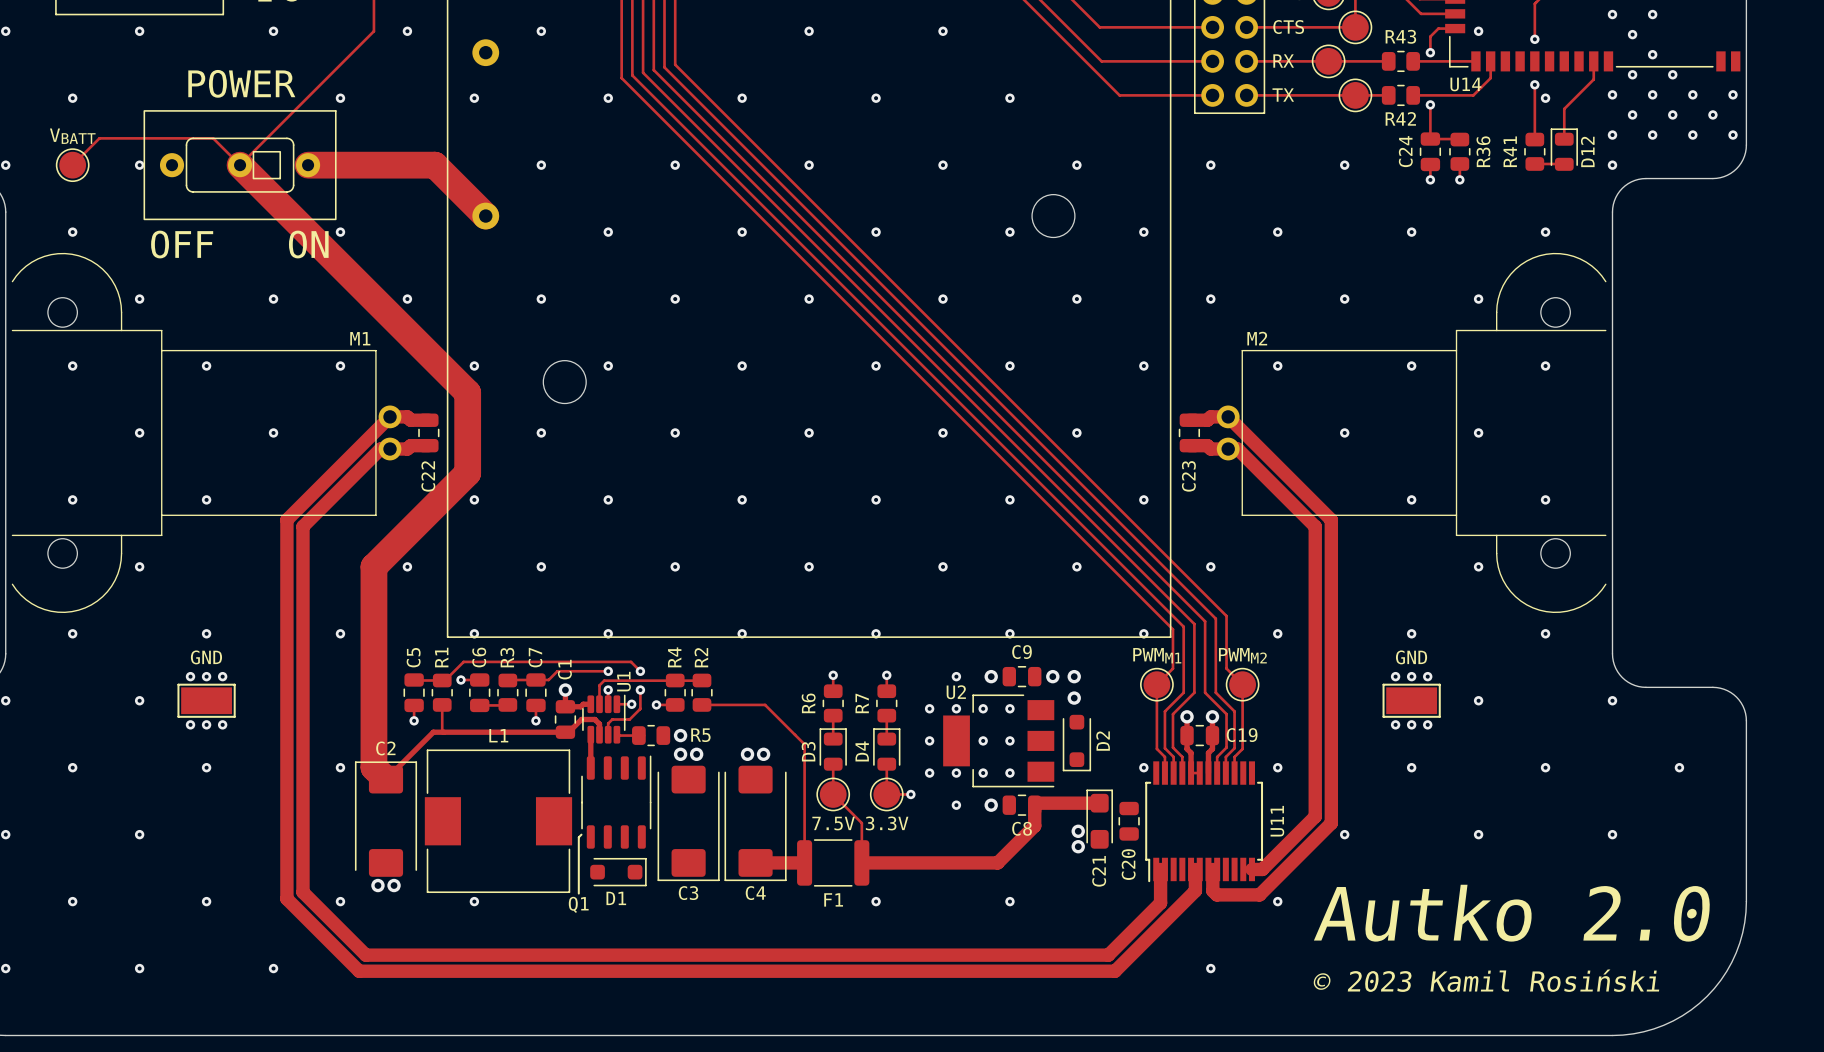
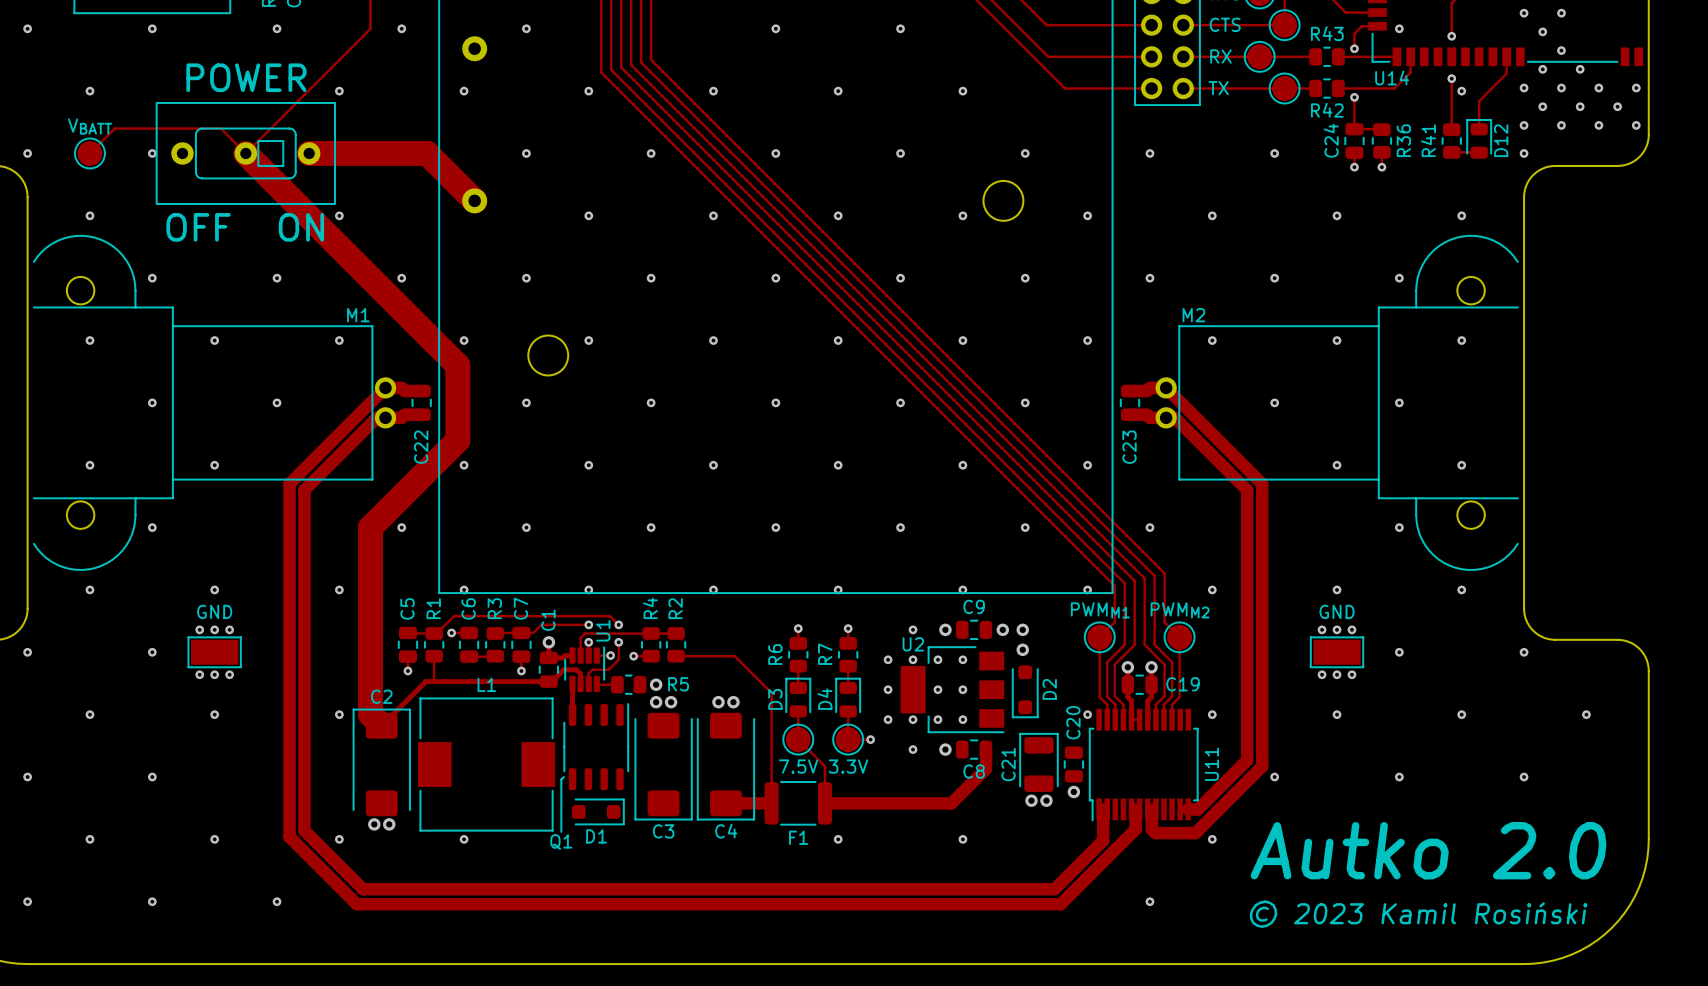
C21 footprint: [1086, 789, 1113, 849] -> [1019, 733, 1059, 792]
track: (1034, 803) (1099, 803) -> none
via: (1078, 831) -> none
via: (1078, 846) -> none
via: none -> (1073, 791)
via: none -> (1031, 800)
via: none -> (1046, 800)
C20 name position: C20 (1128, 864) -> C20 (1073, 722)
C21 name position: C21 (1099, 871) -> C21 (1008, 764)

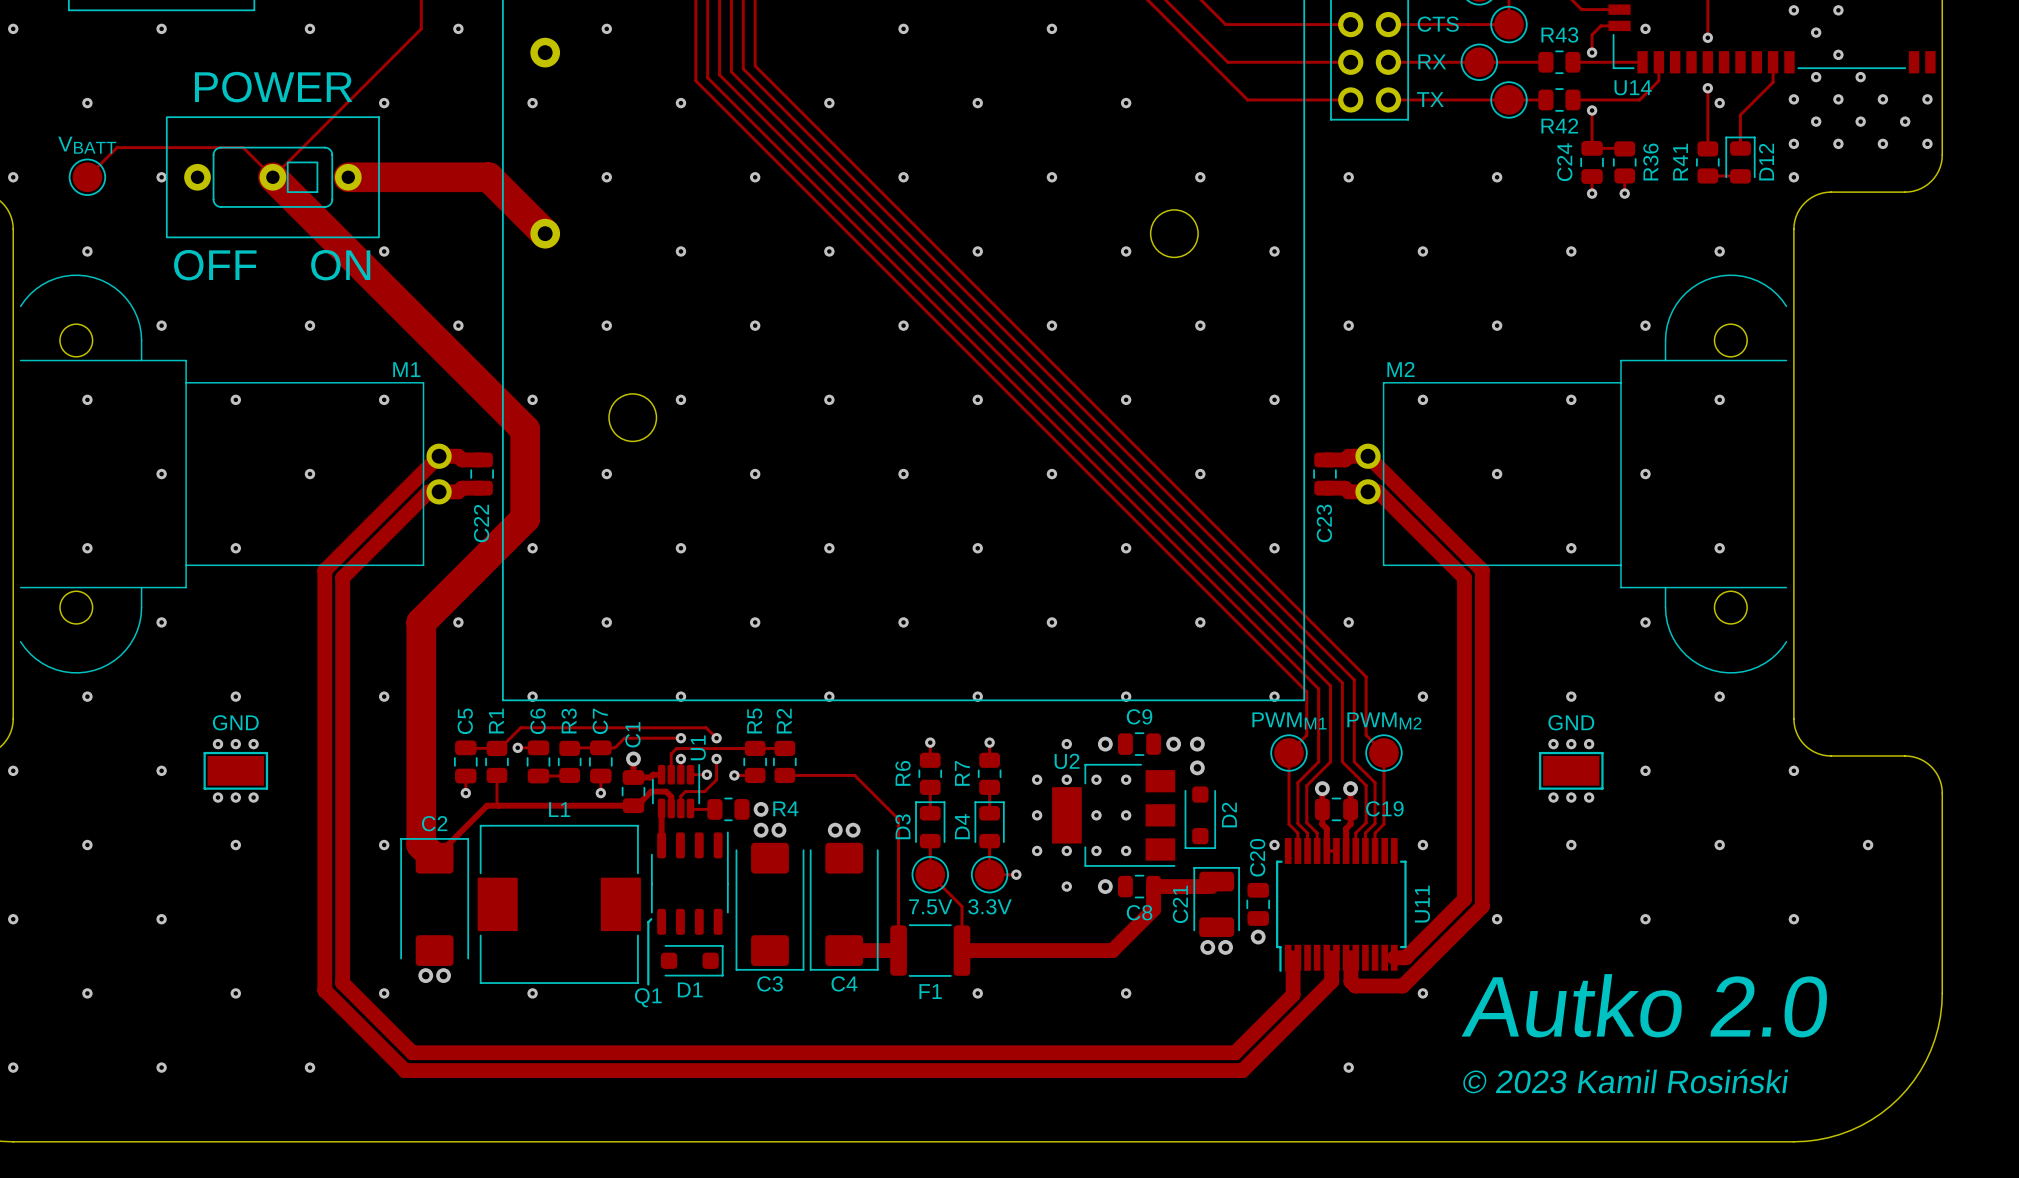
R4 name: R4 (650, 608) -> R5 (754, 720)
R5 name: R5 (678, 684) -> R4 (785, 808)
track: none -> (1153, 886) (1211, 886)

